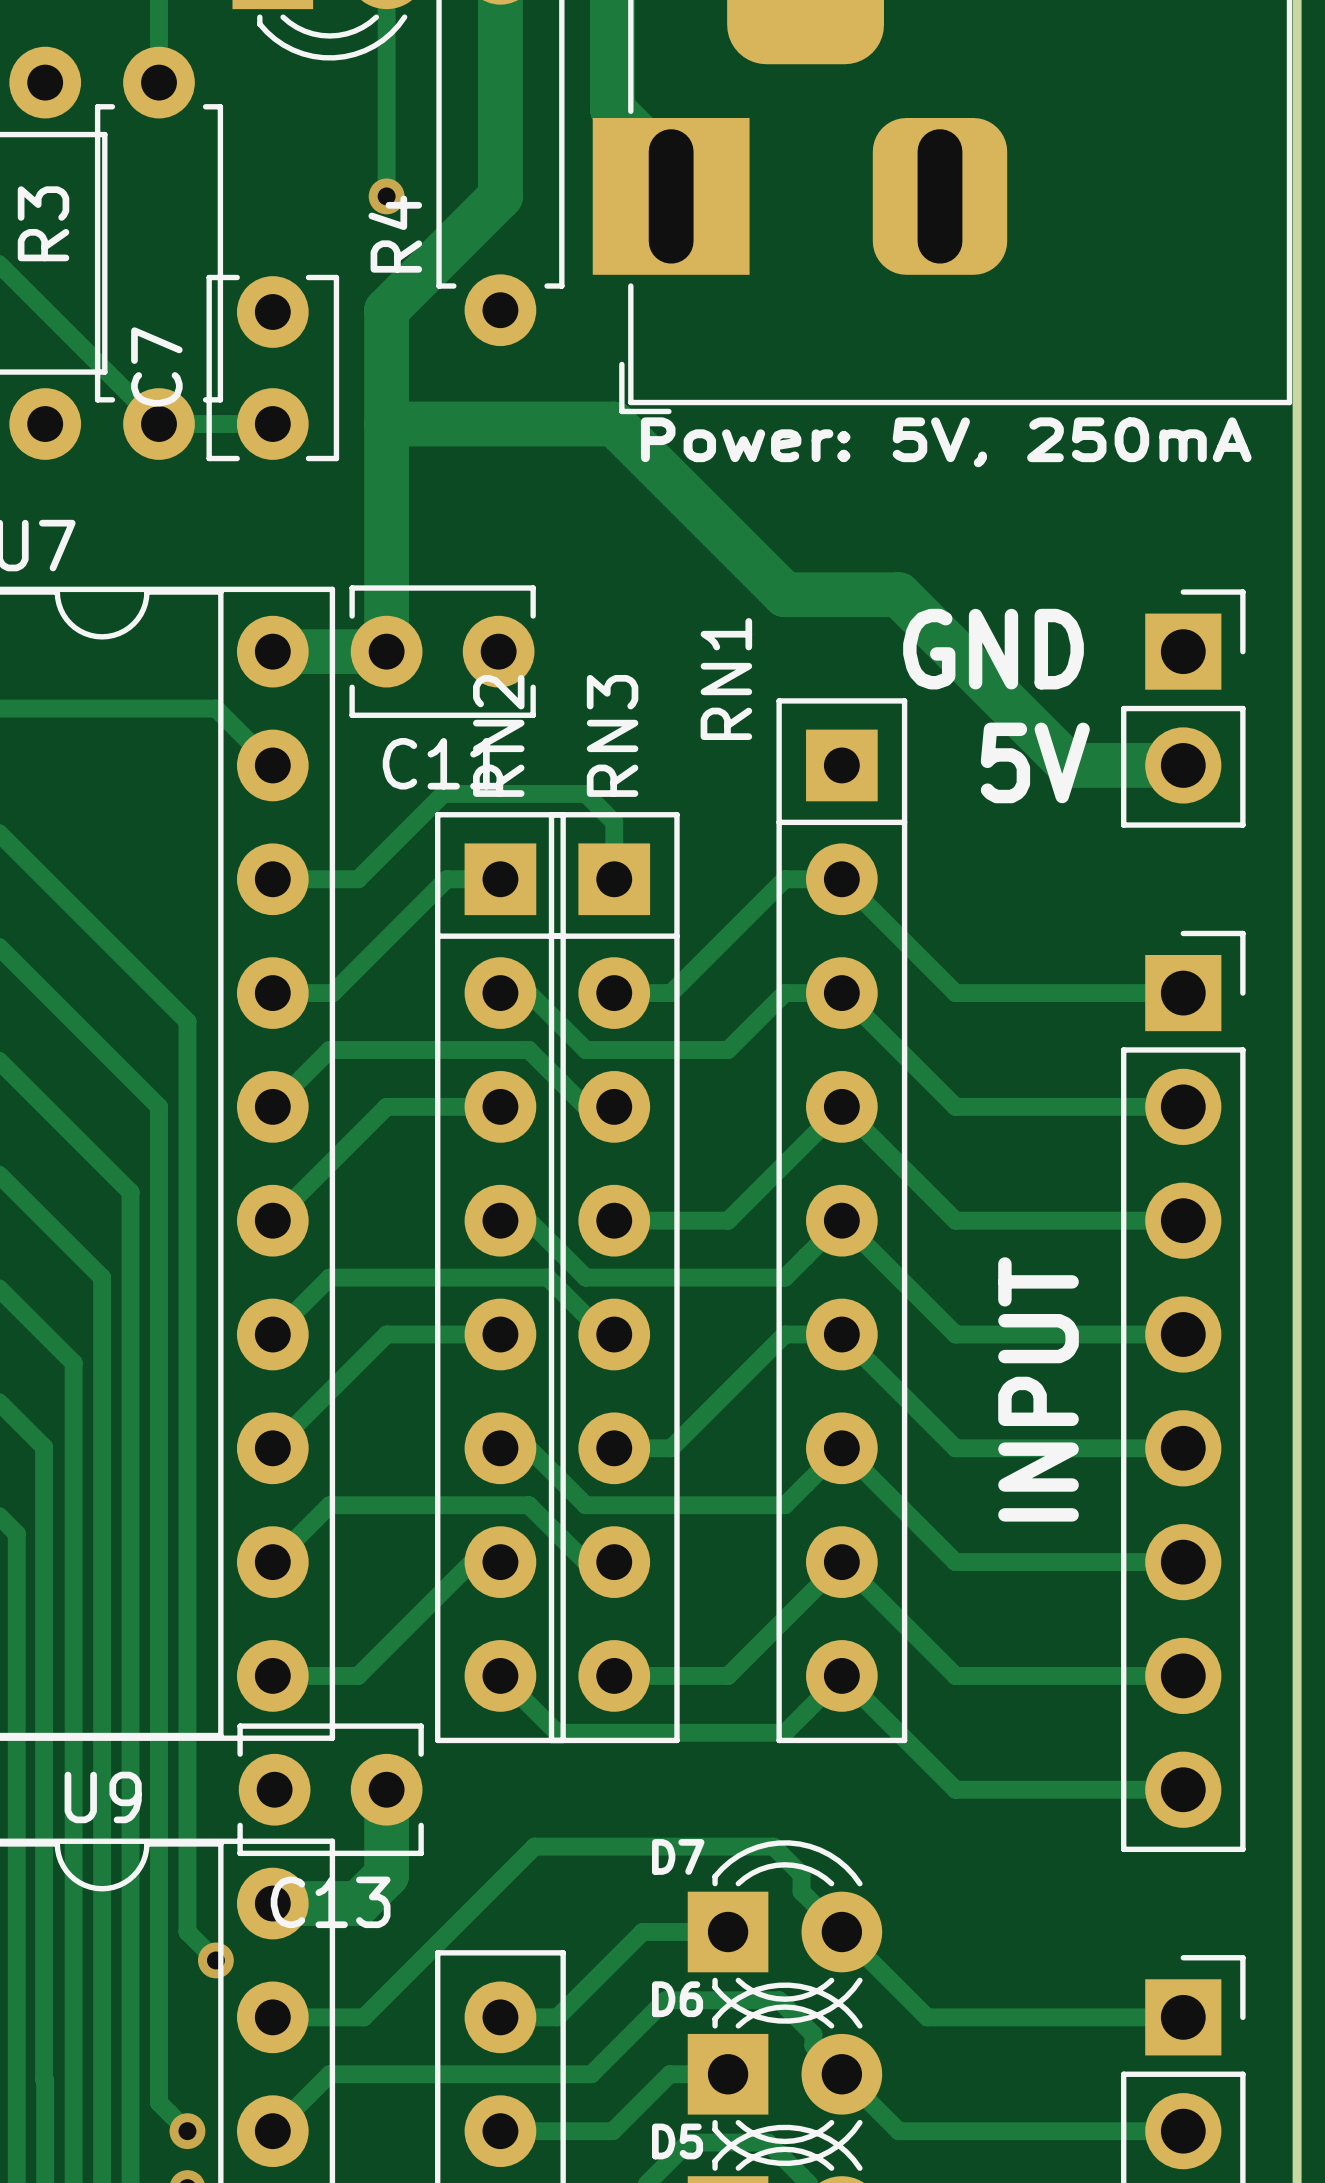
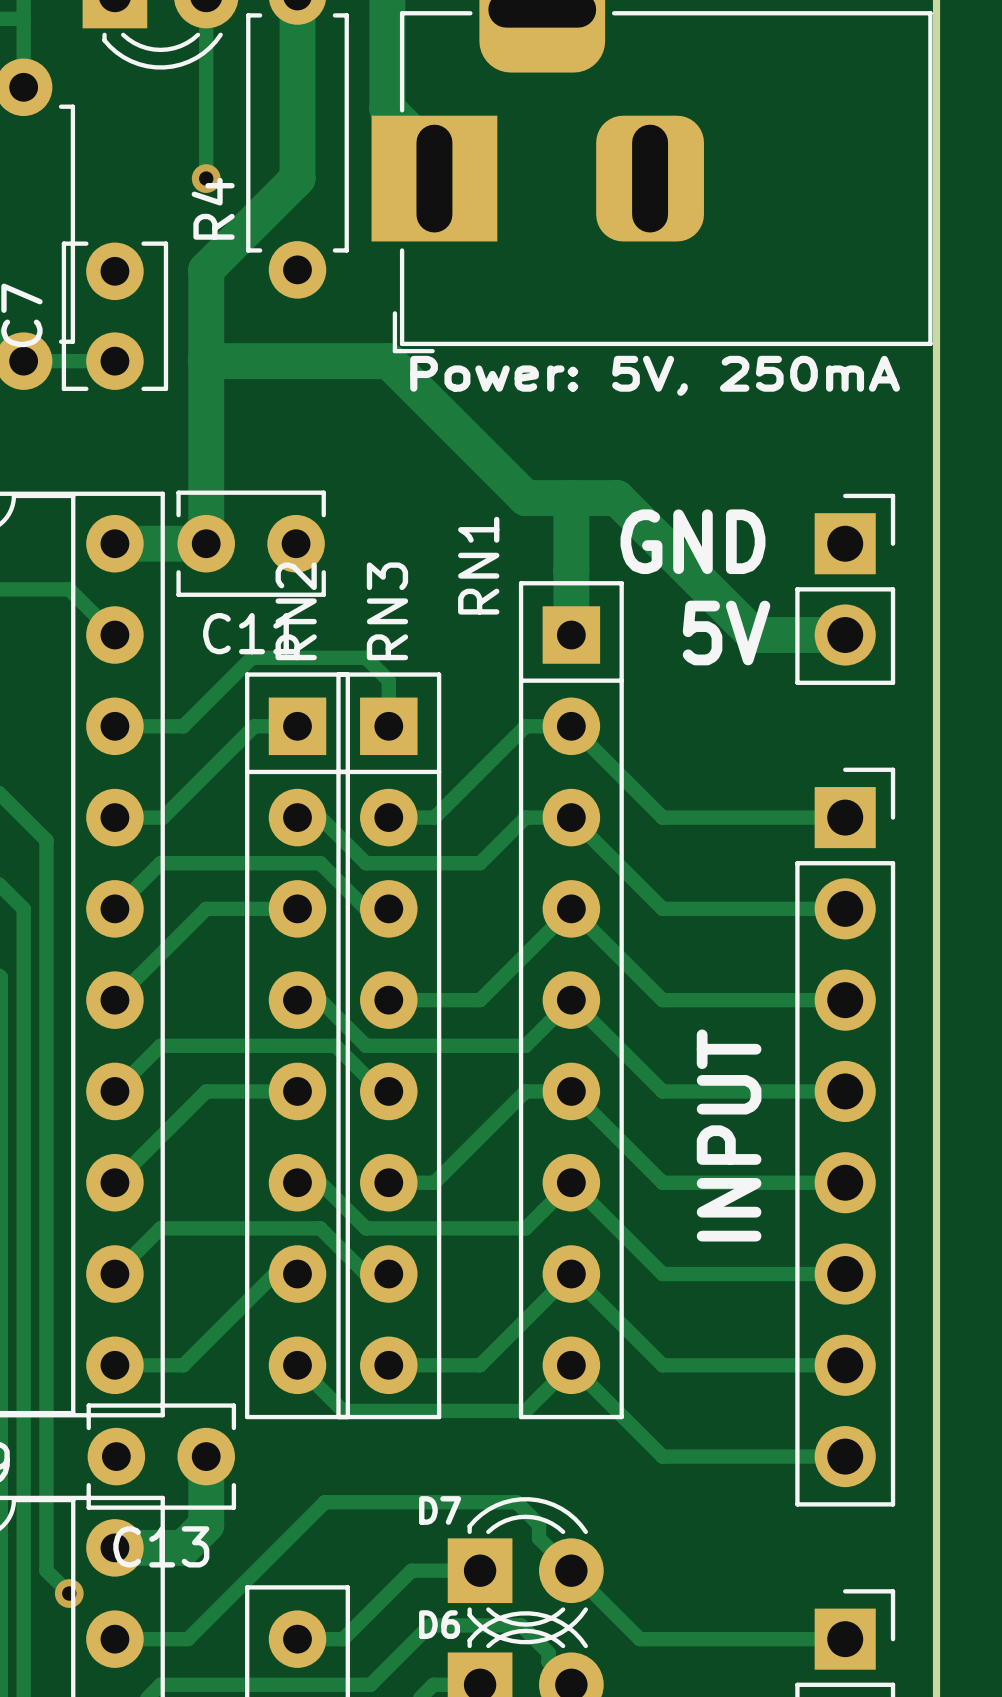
track: none -> (571, 498) (571, 635)

